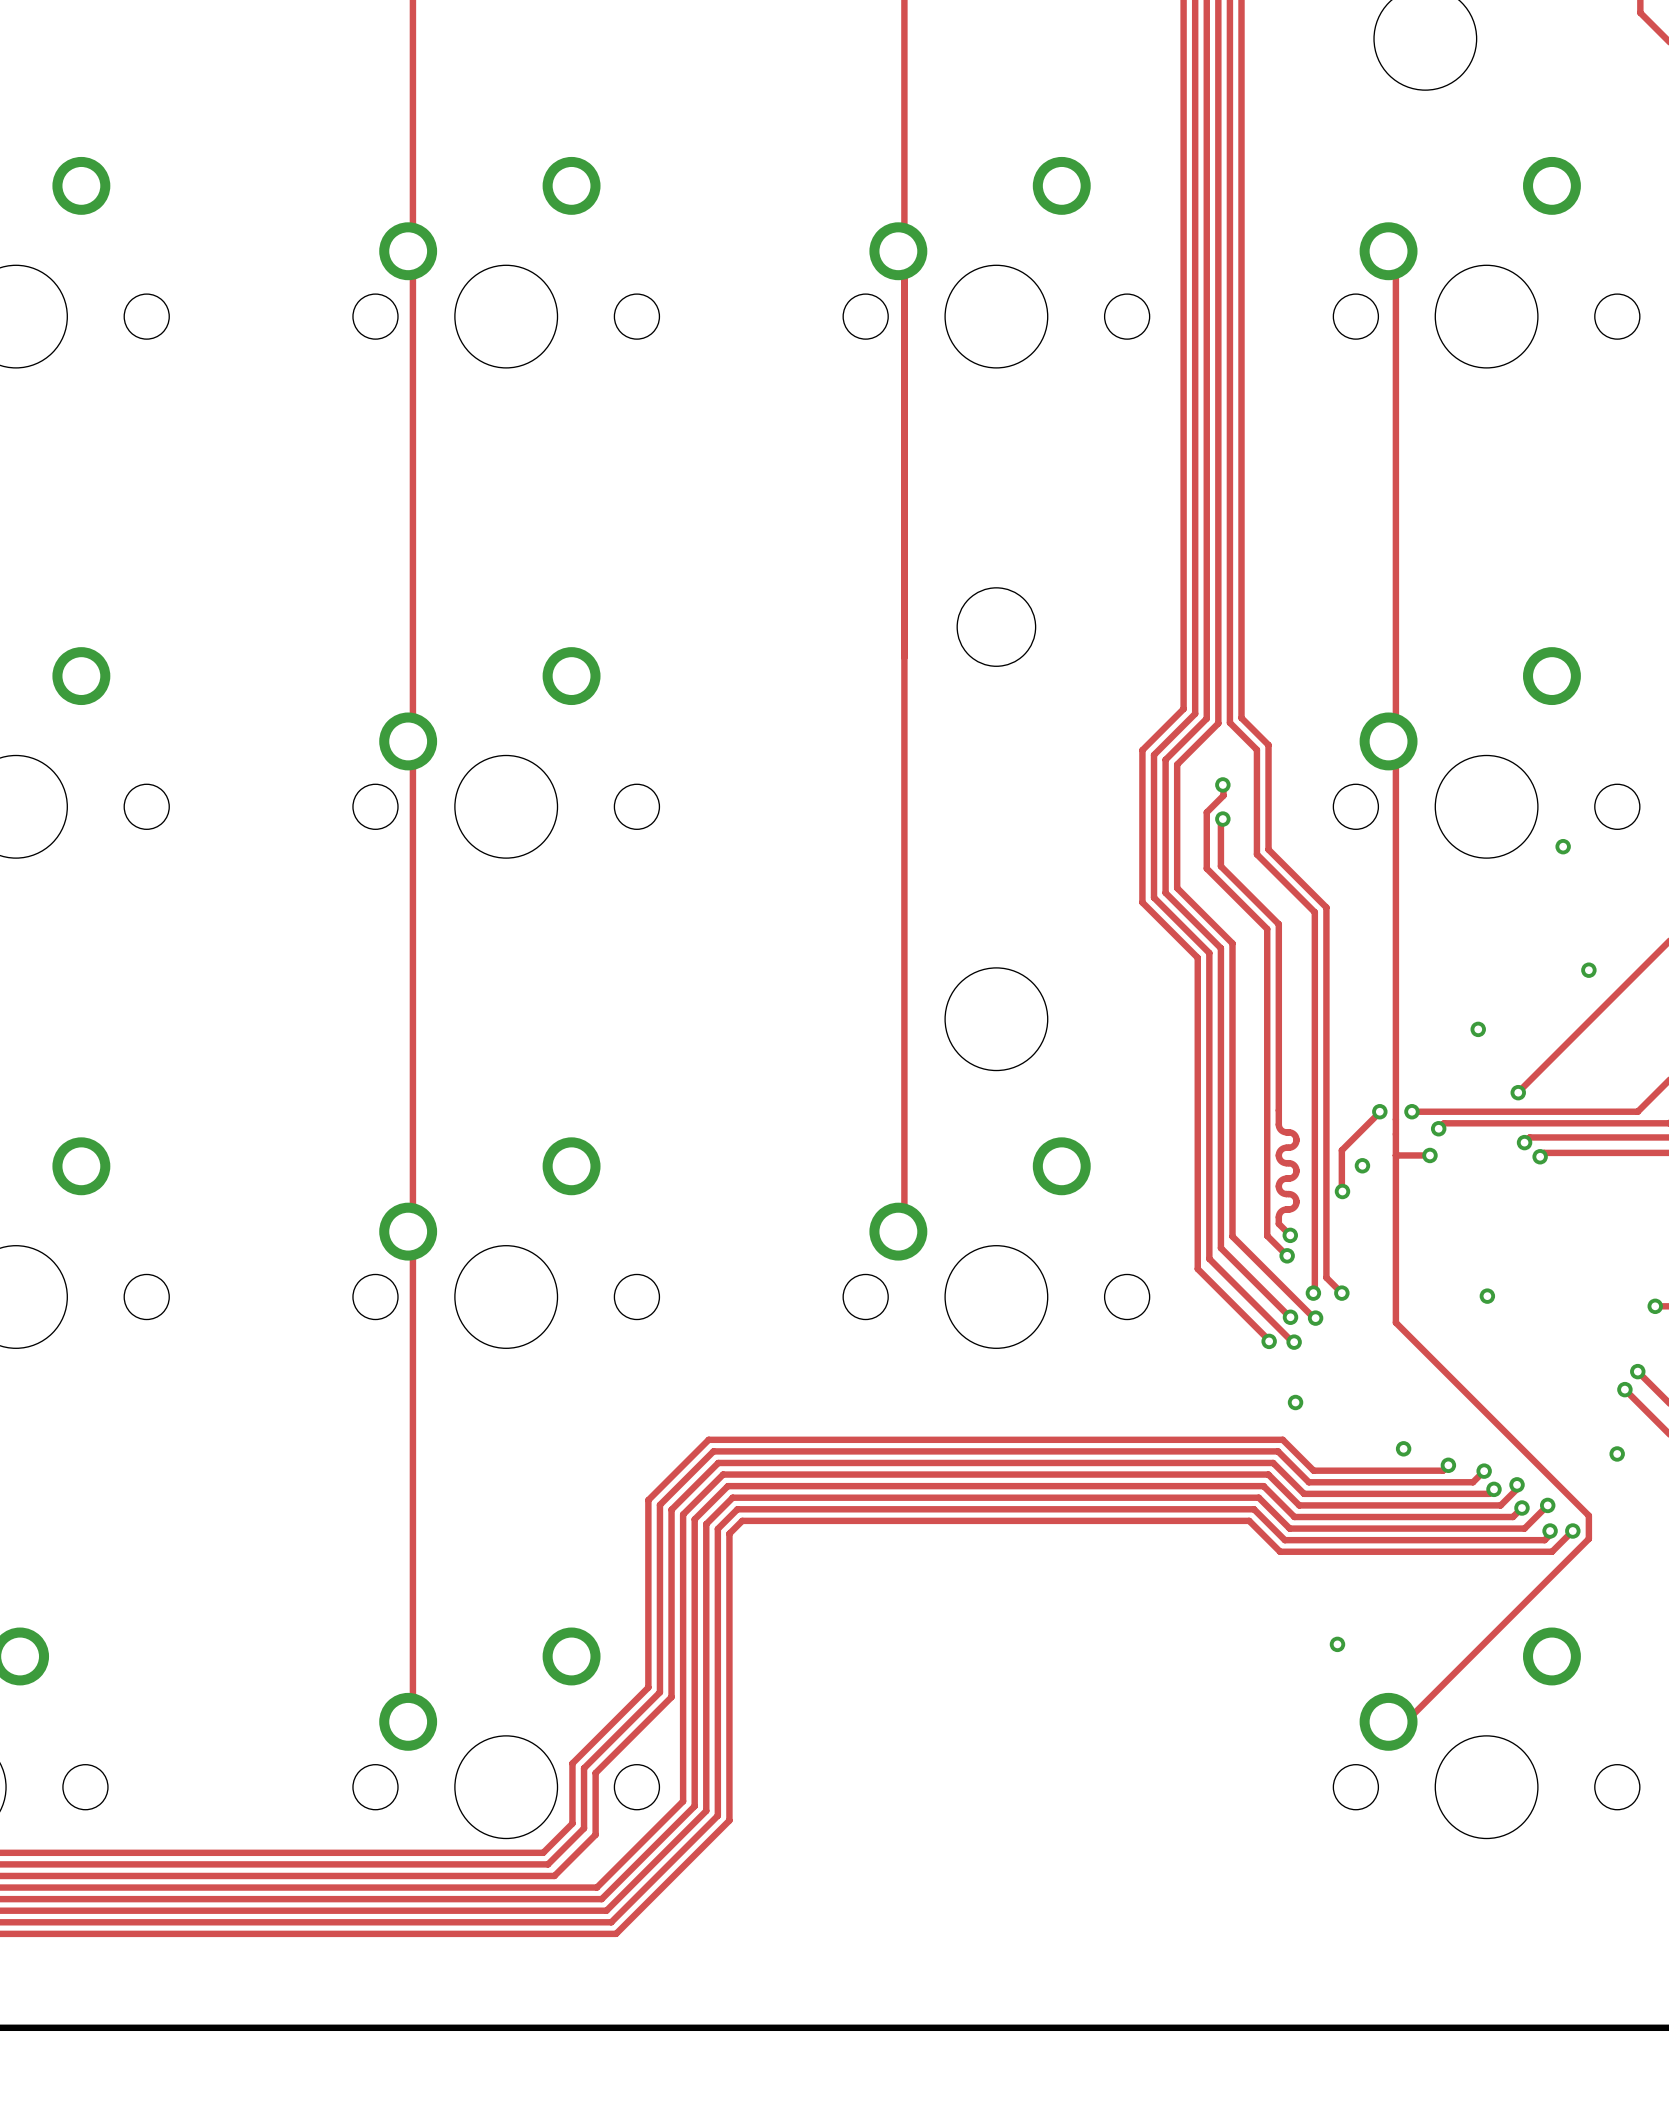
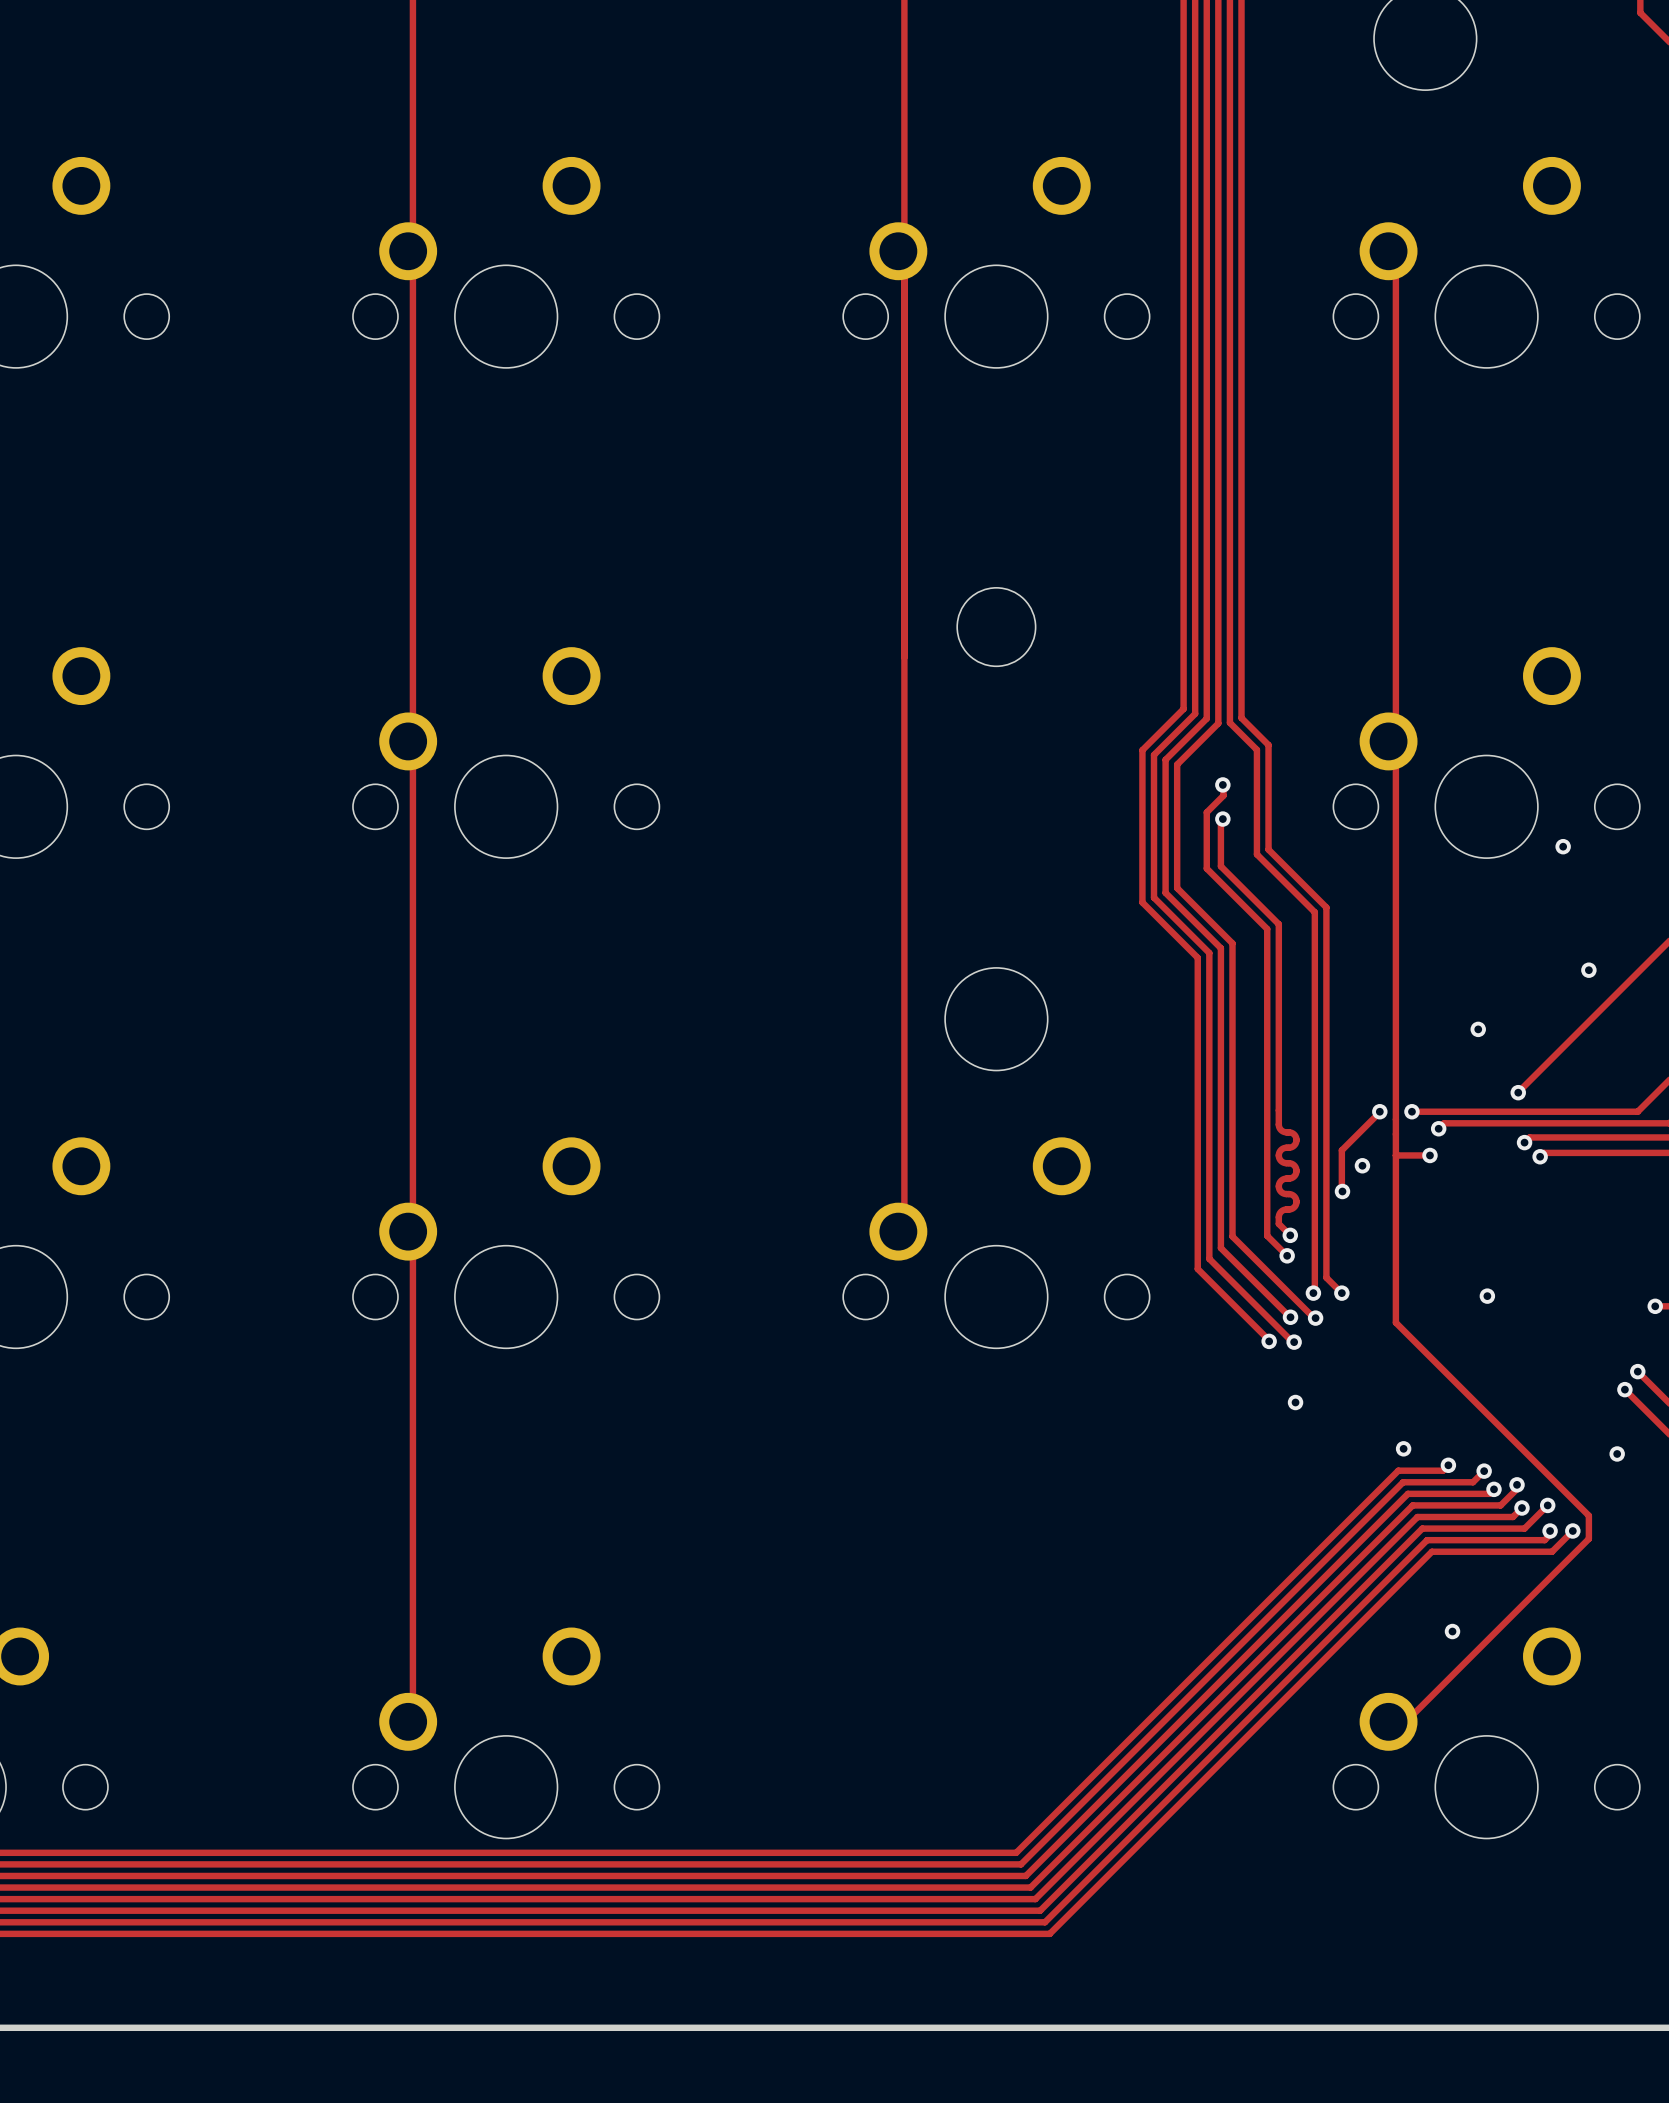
track: (1398, 1470) (1313, 1470) (1282, 1439) (708, 1439) (648, 1500) (648, 1687) (572, 1763) (572, 1823) (543, 1852) -> (1398, 1470) (1016, 1852) (543, 1852)
track: (1403, 1482) (1308, 1482) (1277, 1451) (713, 1451) (659, 1504) (659, 1692) (584, 1768) (584, 1828) (548, 1864) -> (1403, 1482) (1021, 1864) (548, 1864)
track: (1407, 1493) (1304, 1493) (1273, 1462) (718, 1462) (671, 1509) (671, 1697) (595, 1773) (595, 1834) (554, 1875) -> (1407, 1493) (1025, 1875) (554, 1875)
track: (1412, 1505) (1299, 1505) (1268, 1474) (723, 1474) (683, 1514) (683, 1801) (596, 1887) -> (1412, 1505) (1030, 1887) (596, 1887)
track: (1417, 1517) (1294, 1517) (1263, 1486) (727, 1486) (694, 1519) (694, 1806) (601, 1899) -> (1417, 1517) (1035, 1899) (601, 1899)
track: (1422, 1528) (1289, 1528) (1258, 1497) (732, 1497) (706, 1524) (706, 1810) (606, 1910) -> (1422, 1528) (1040, 1910) (606, 1910)
track: (1427, 1540) (1284, 1540) (1254, 1509) (737, 1509) (717, 1528) (717, 1815) (611, 1922) -> (1427, 1540) (1045, 1922) (611, 1922)
track: (1431, 1551) (1280, 1551) (1249, 1520) (742, 1520) (729, 1533) (729, 1820) (616, 1933) -> (1431, 1551) (1049, 1933) (616, 1933)
via position: (1337, 1644) -> (1452, 1631)

